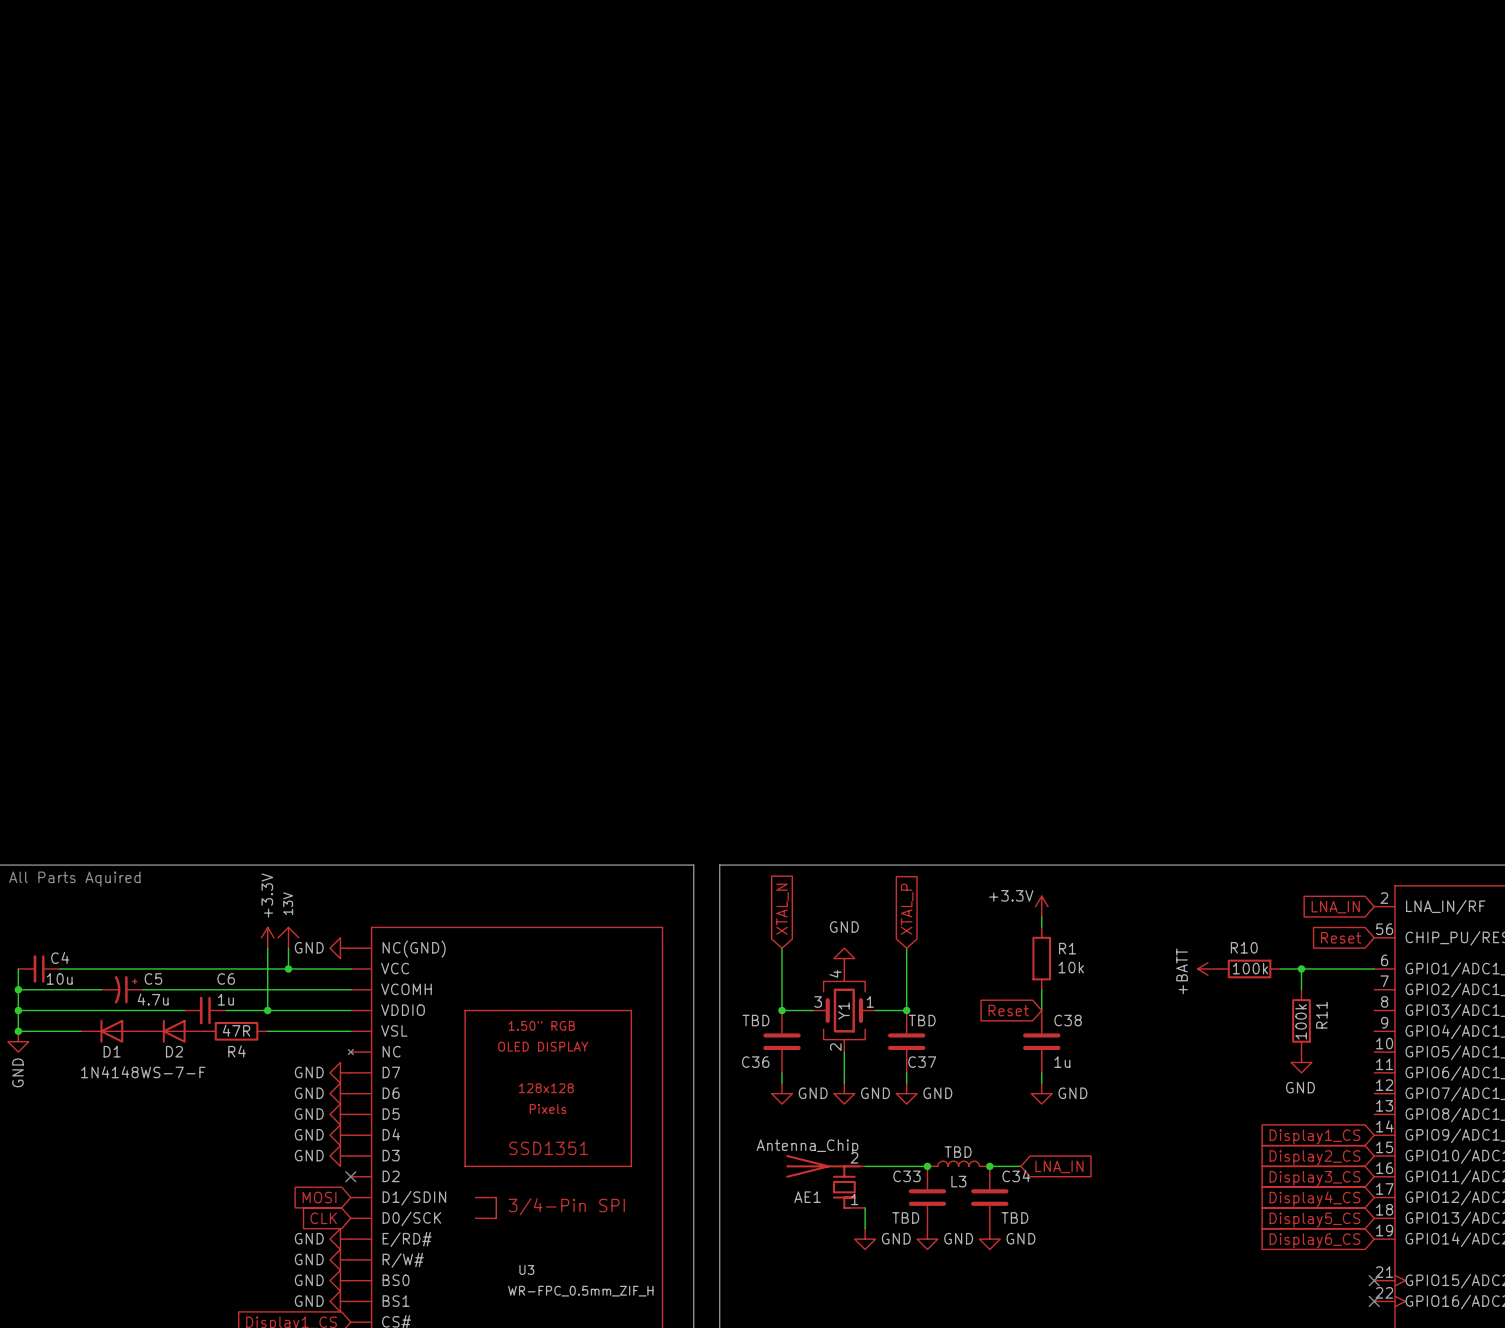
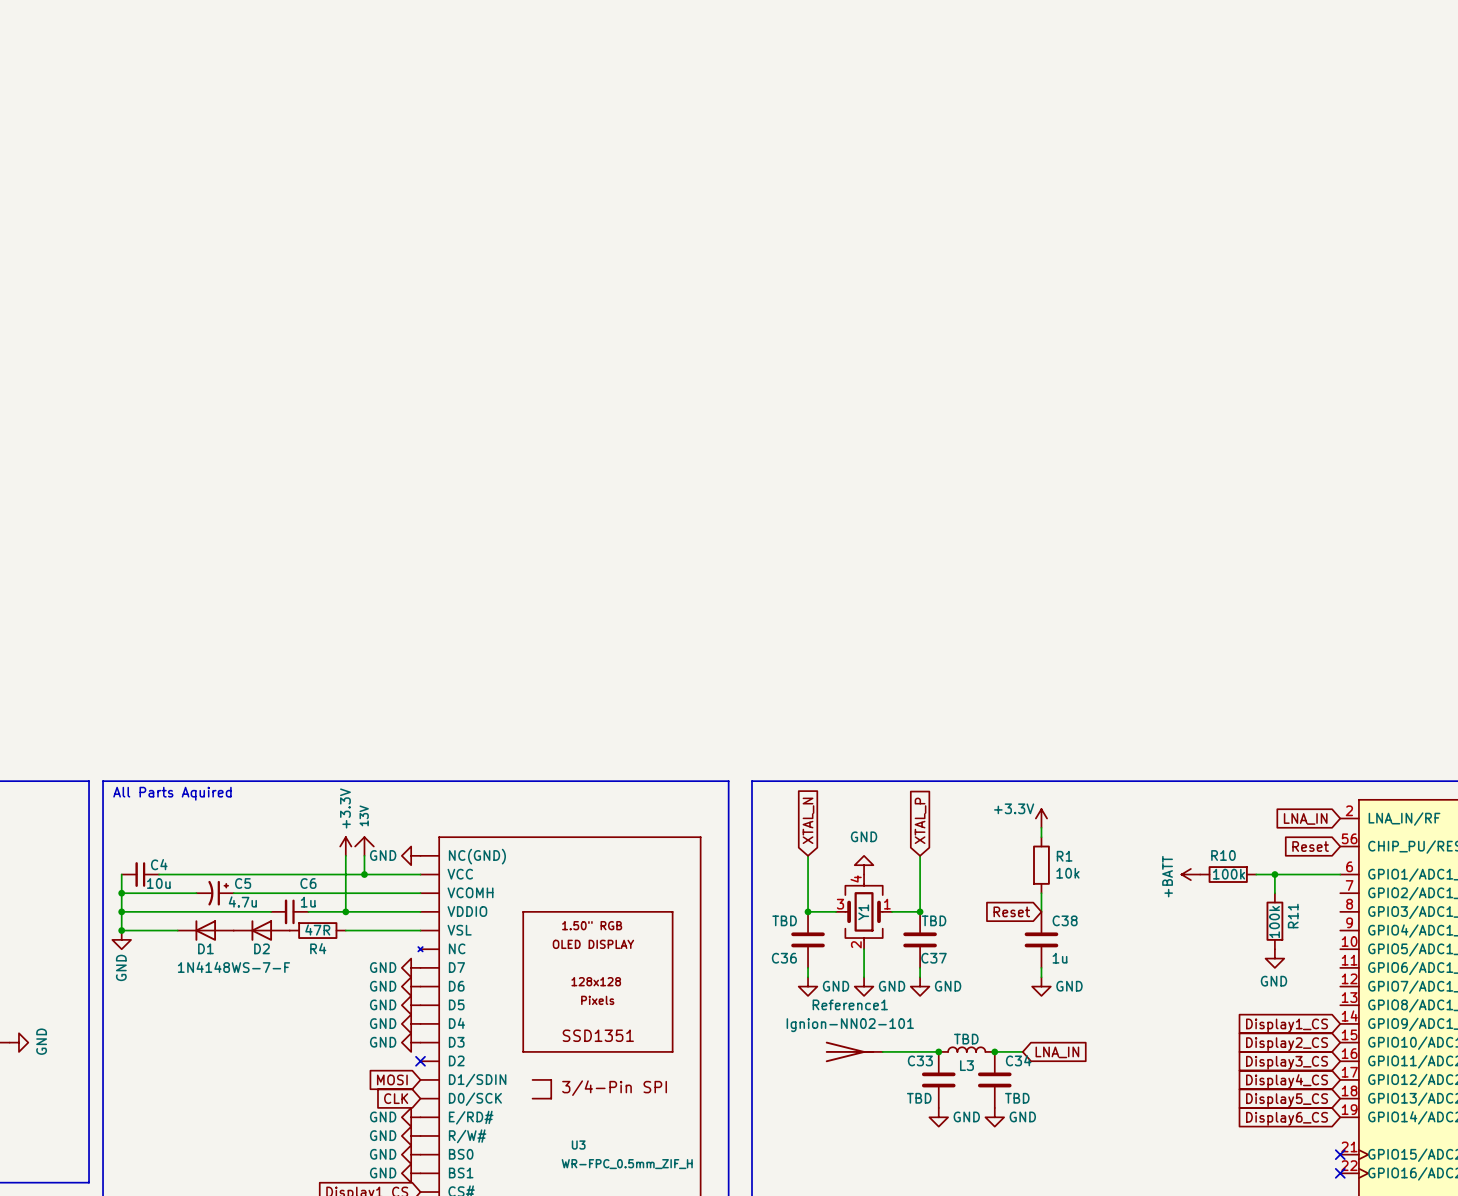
Reference1: none -> Ignion-NN02-101 (854, 1051)
AE1: Antenna_Chip (825, 1181) -> none
wire: (865, 1207) (865, 1228) -> none
power symbol: GND (865, 1239) -> none

